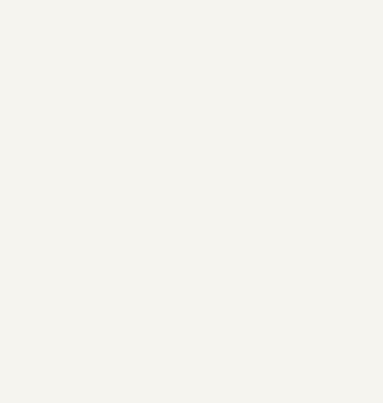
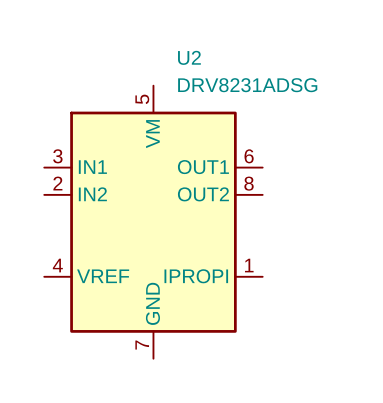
U2: none -> DRV8231ADSG (153, 222)

